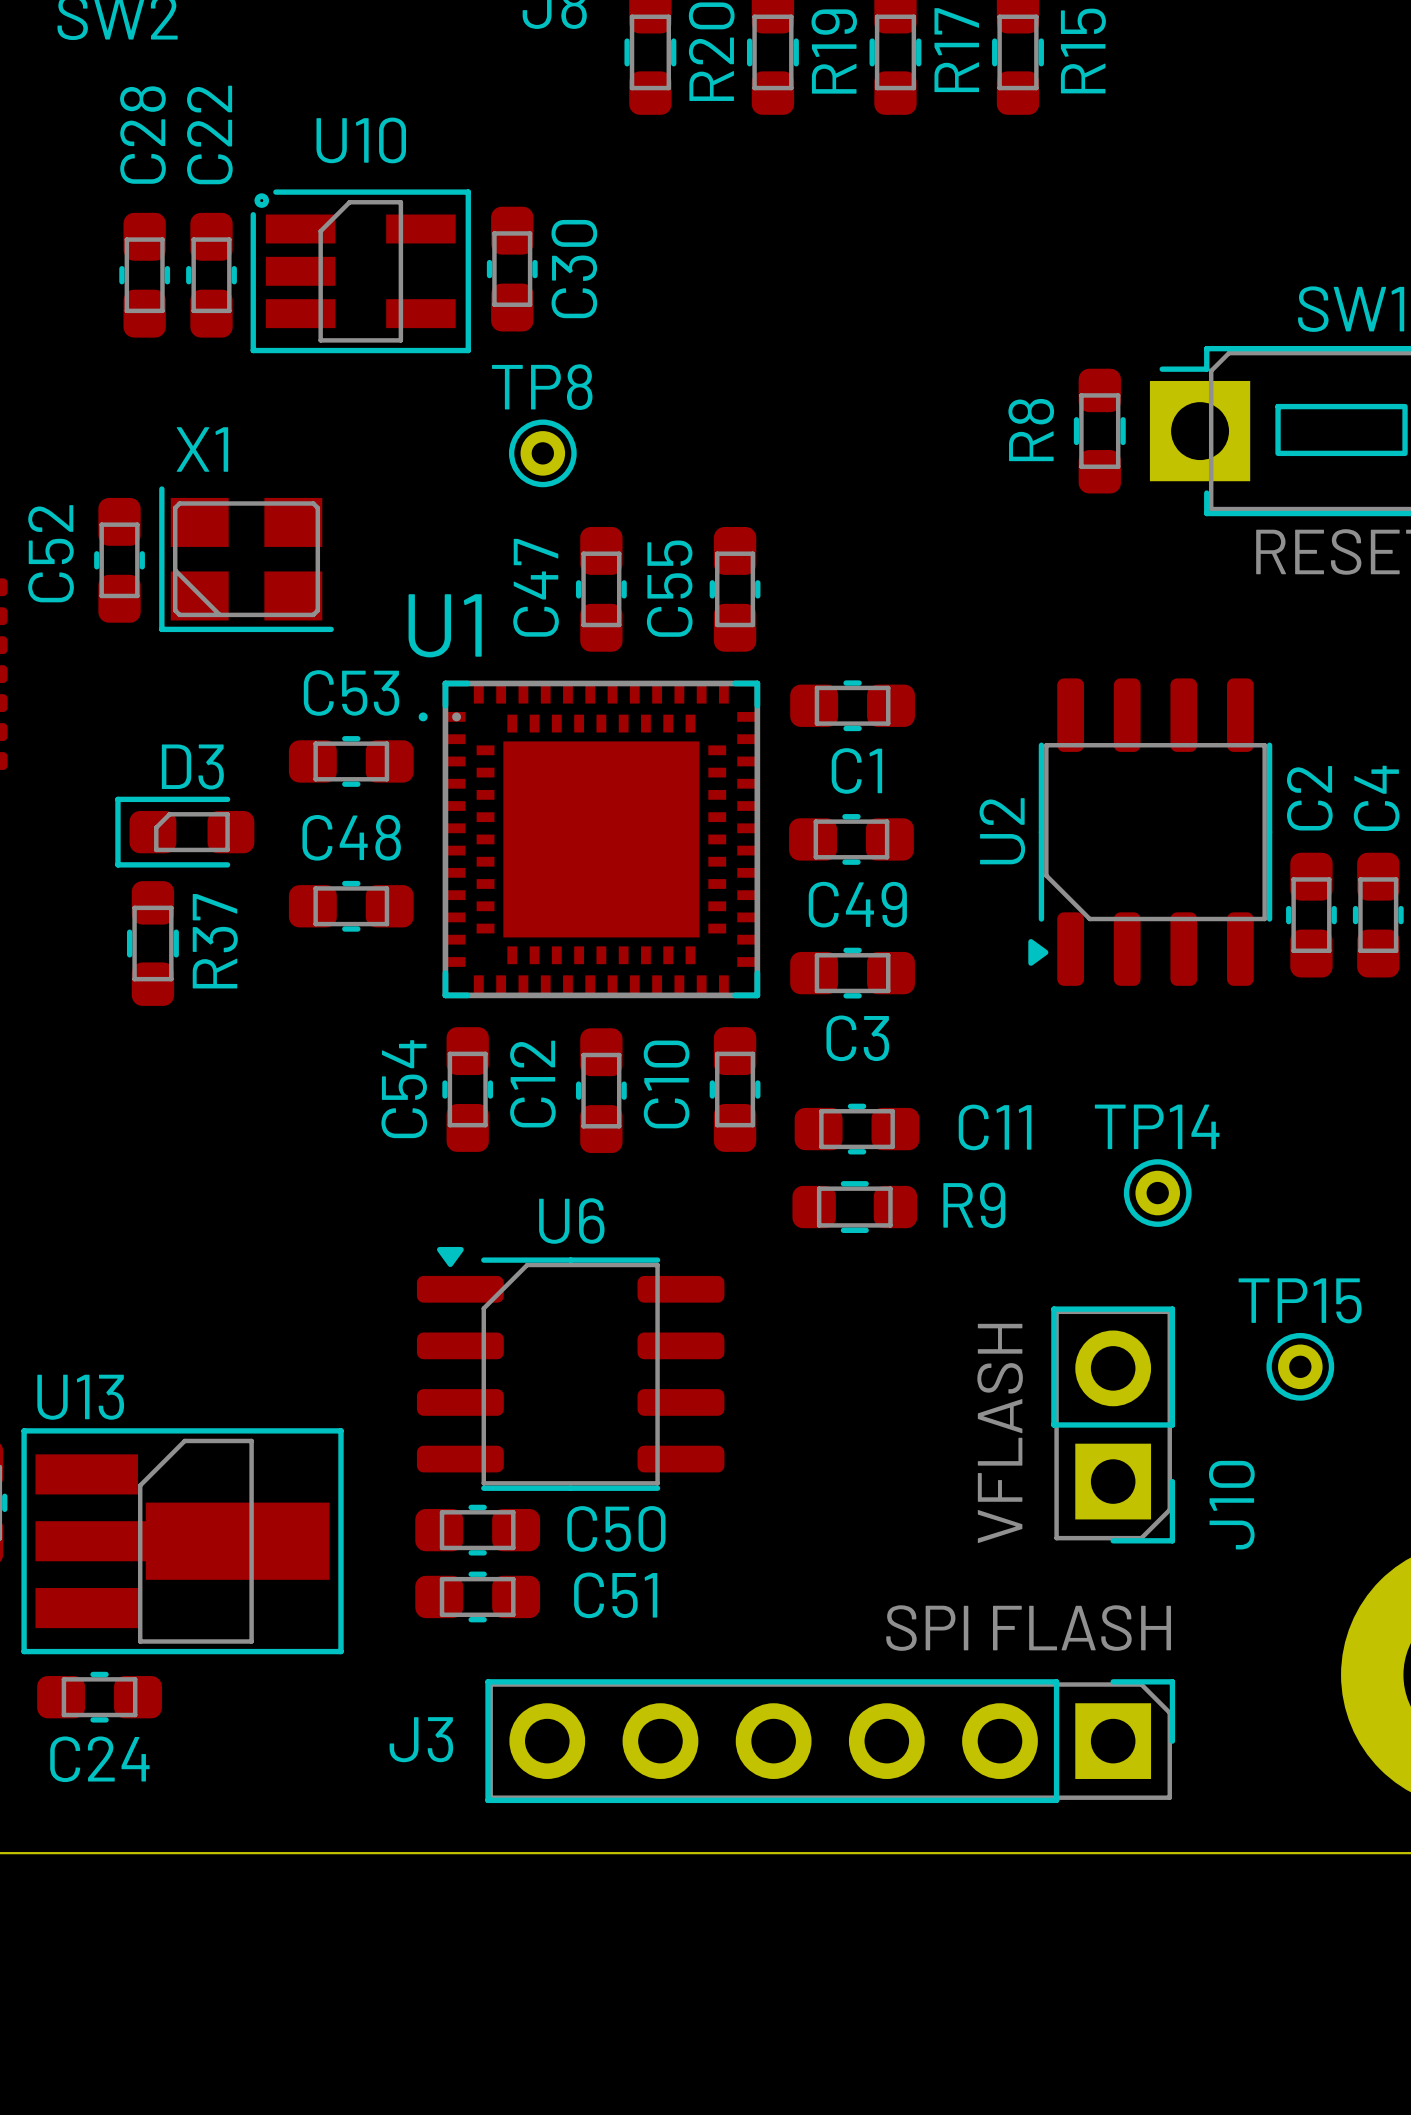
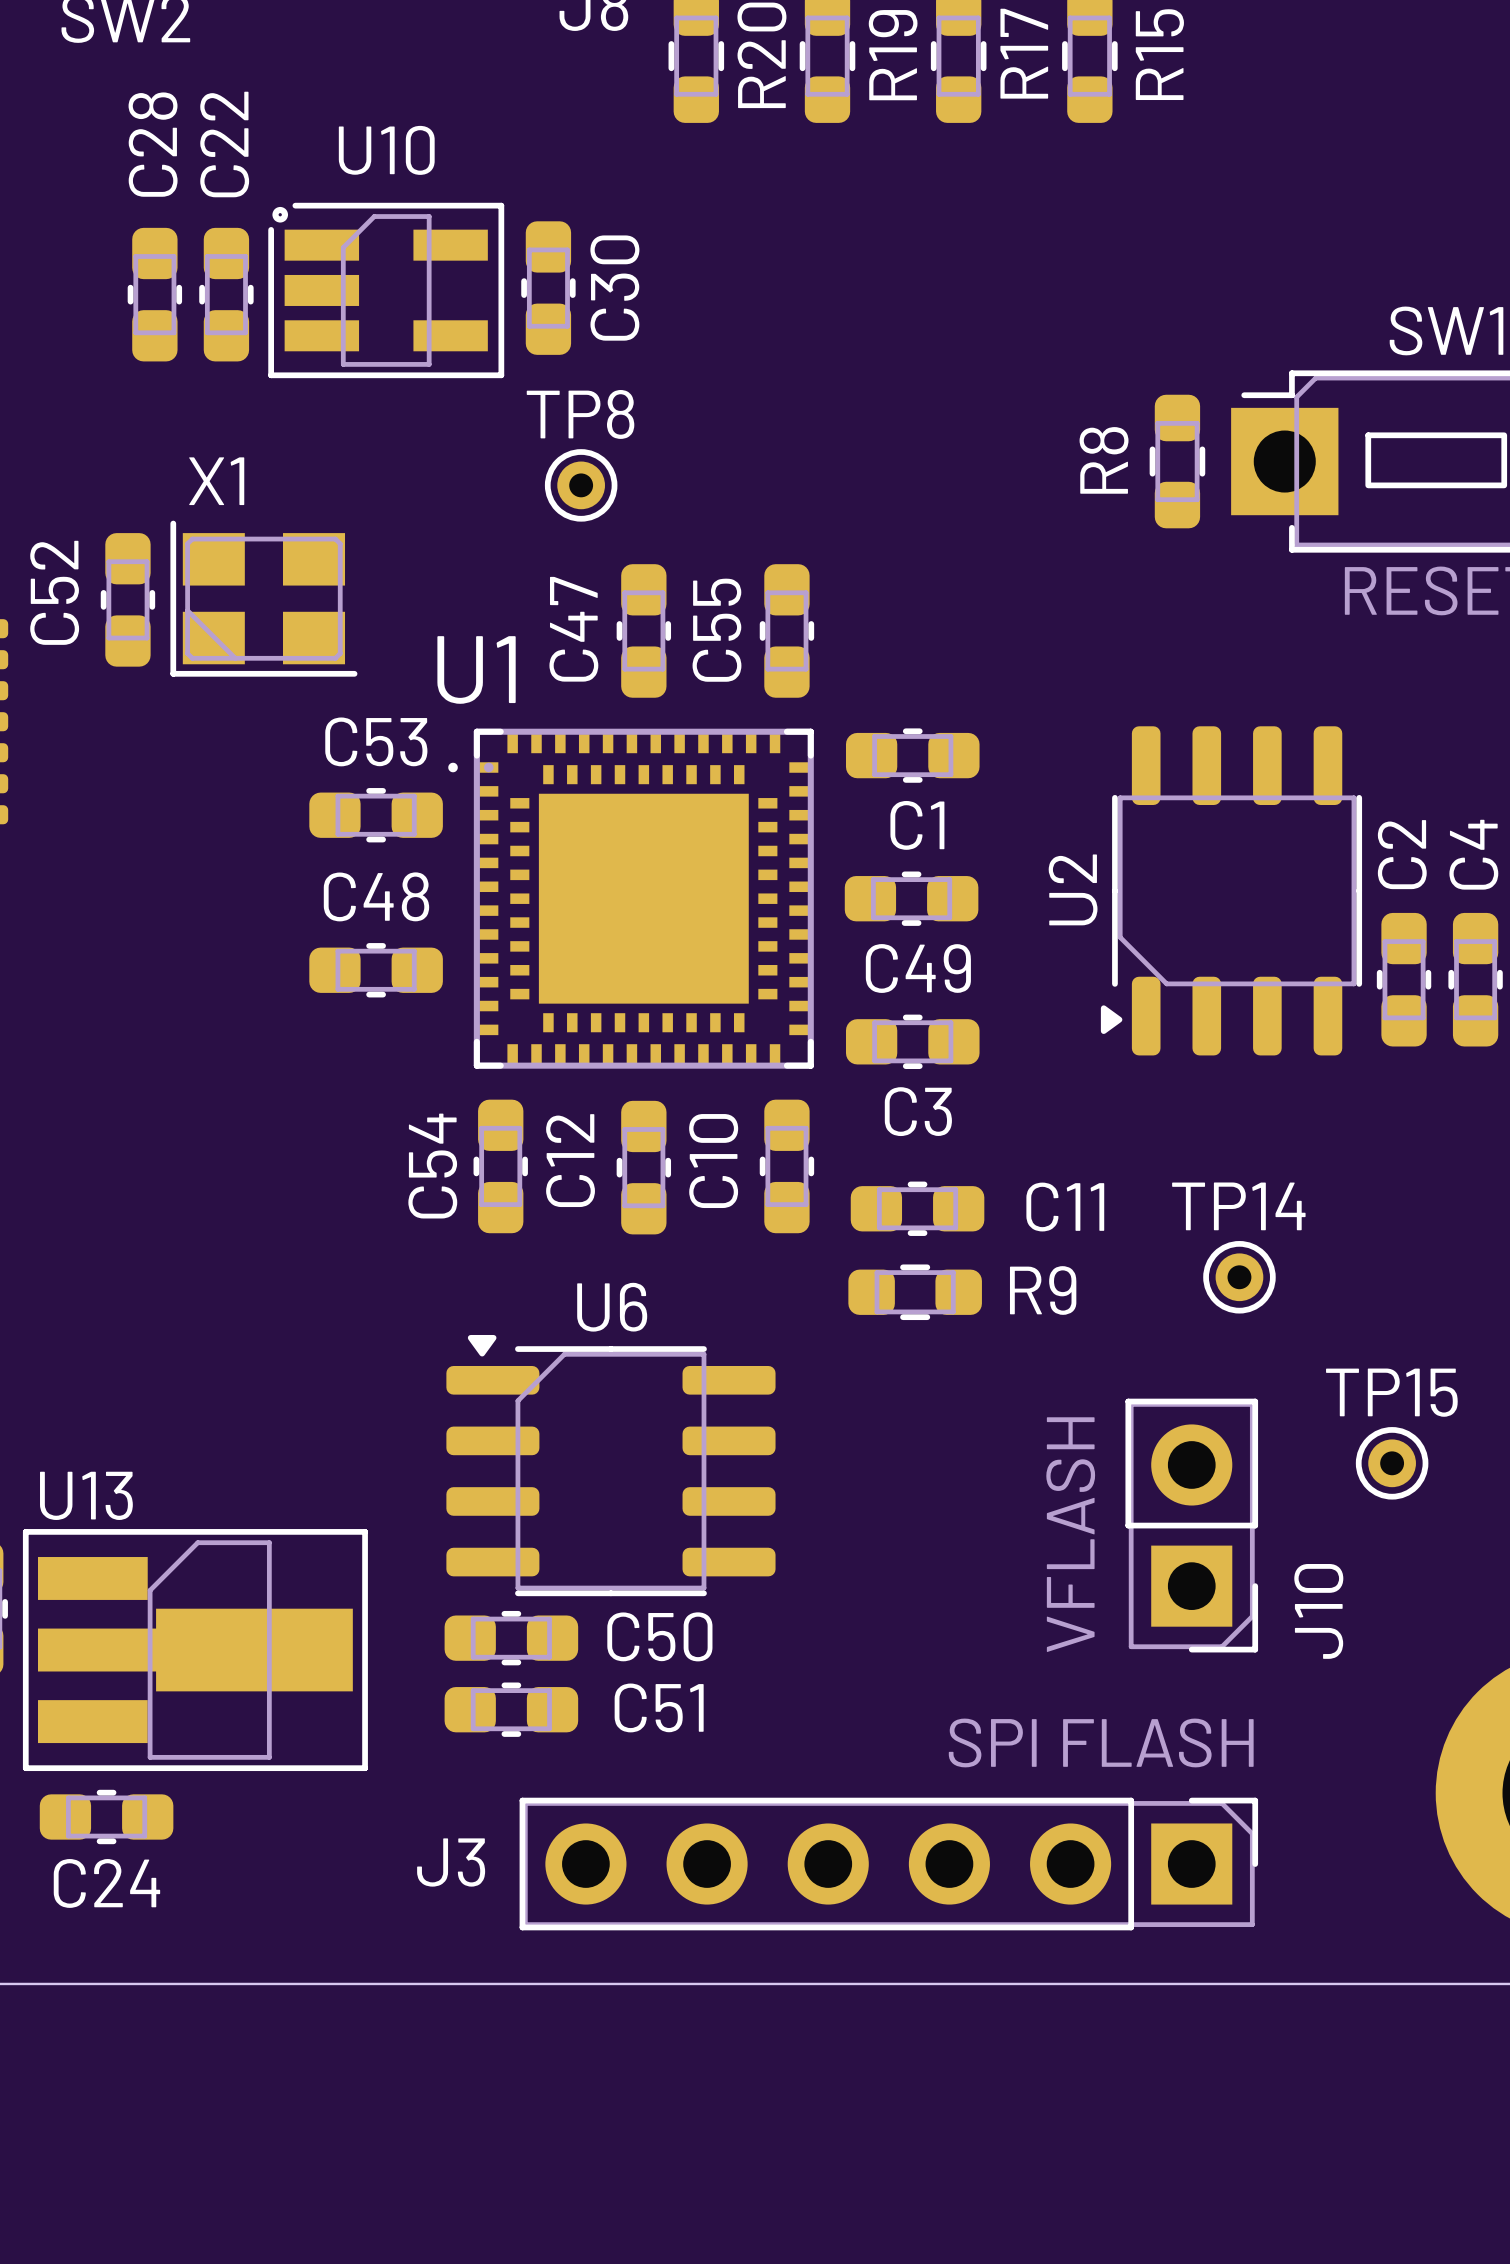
D3: (184, 832) -> none
R37: (152, 943) -> none

